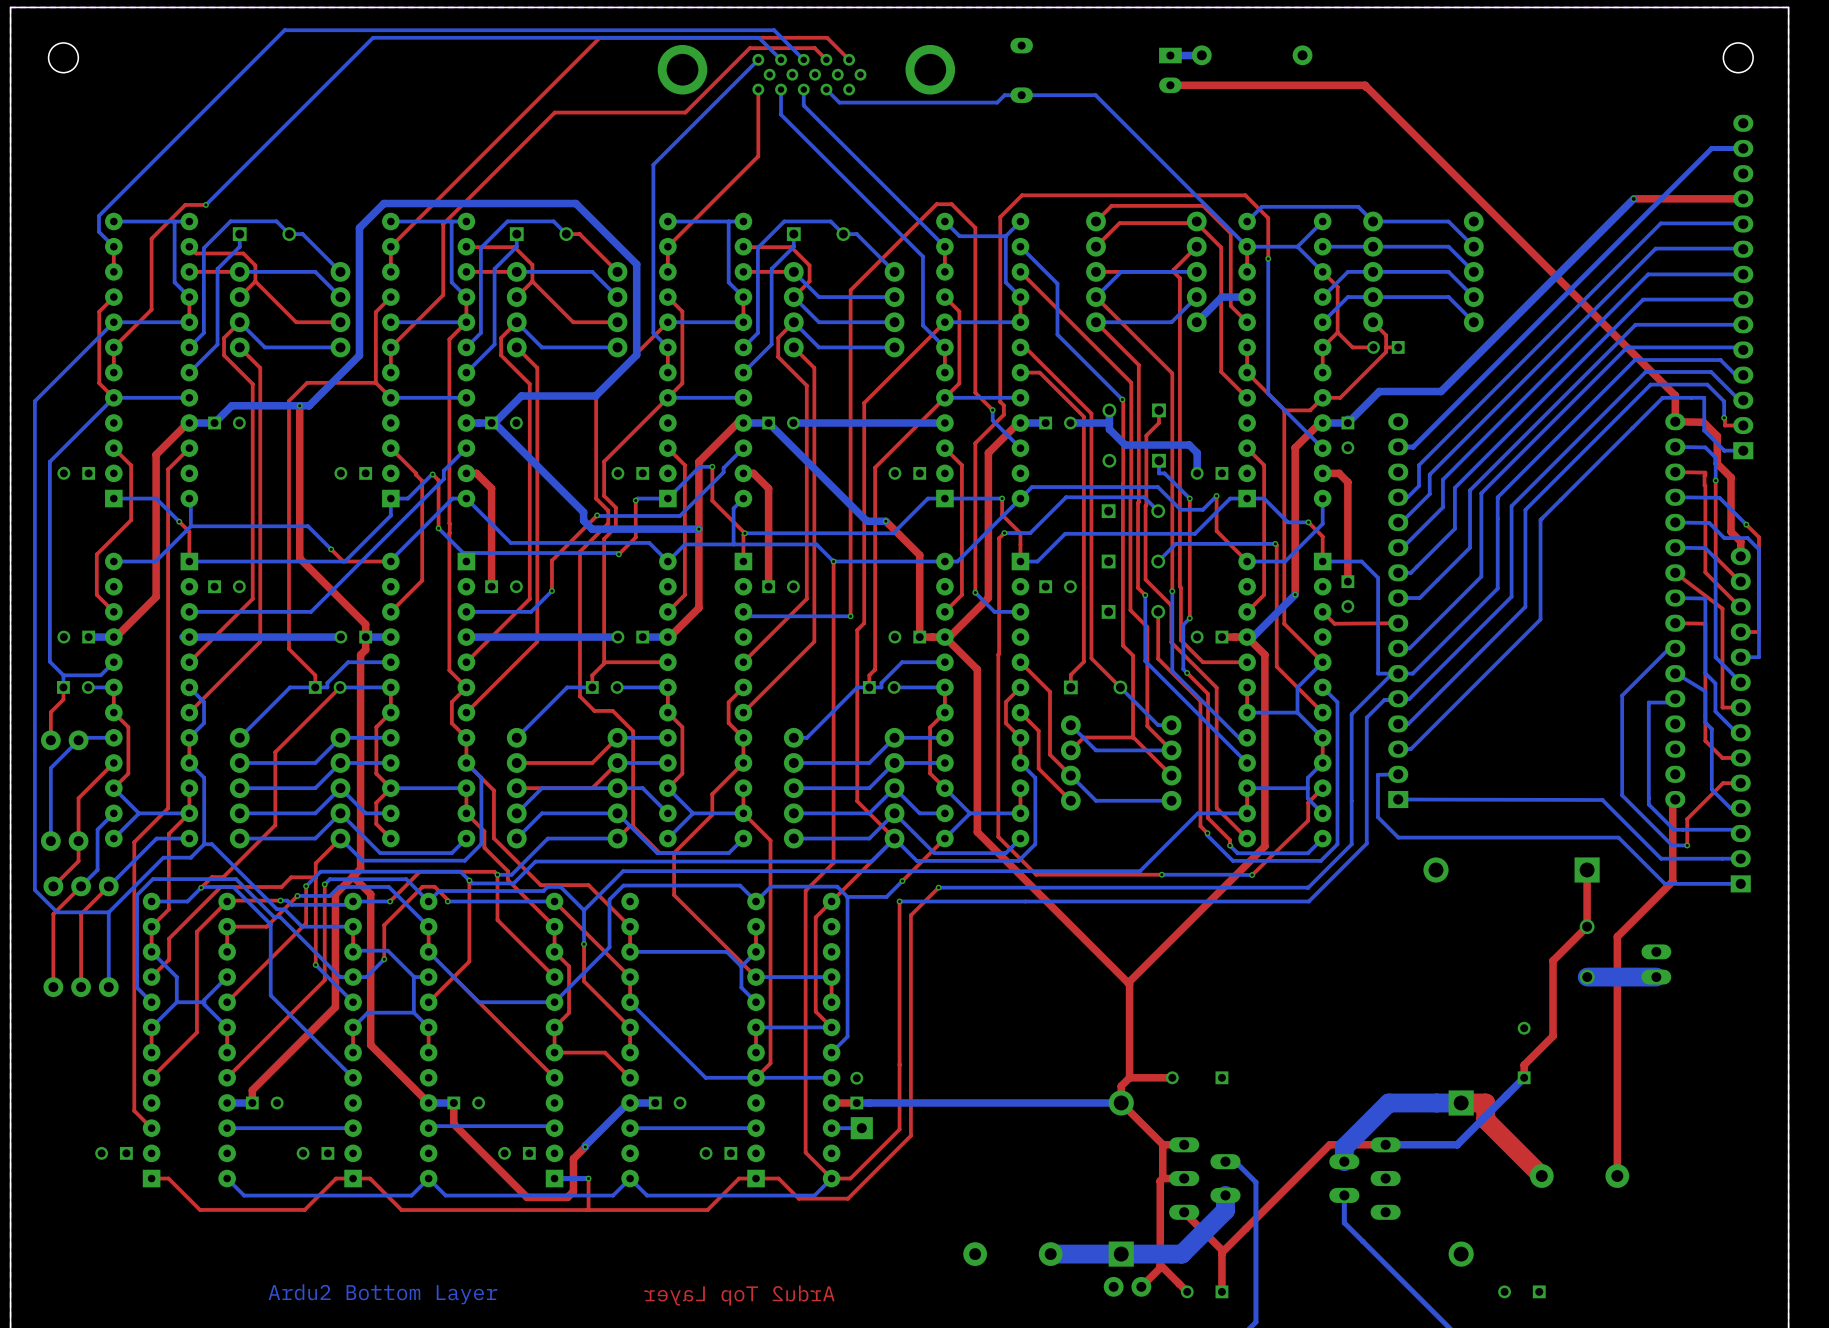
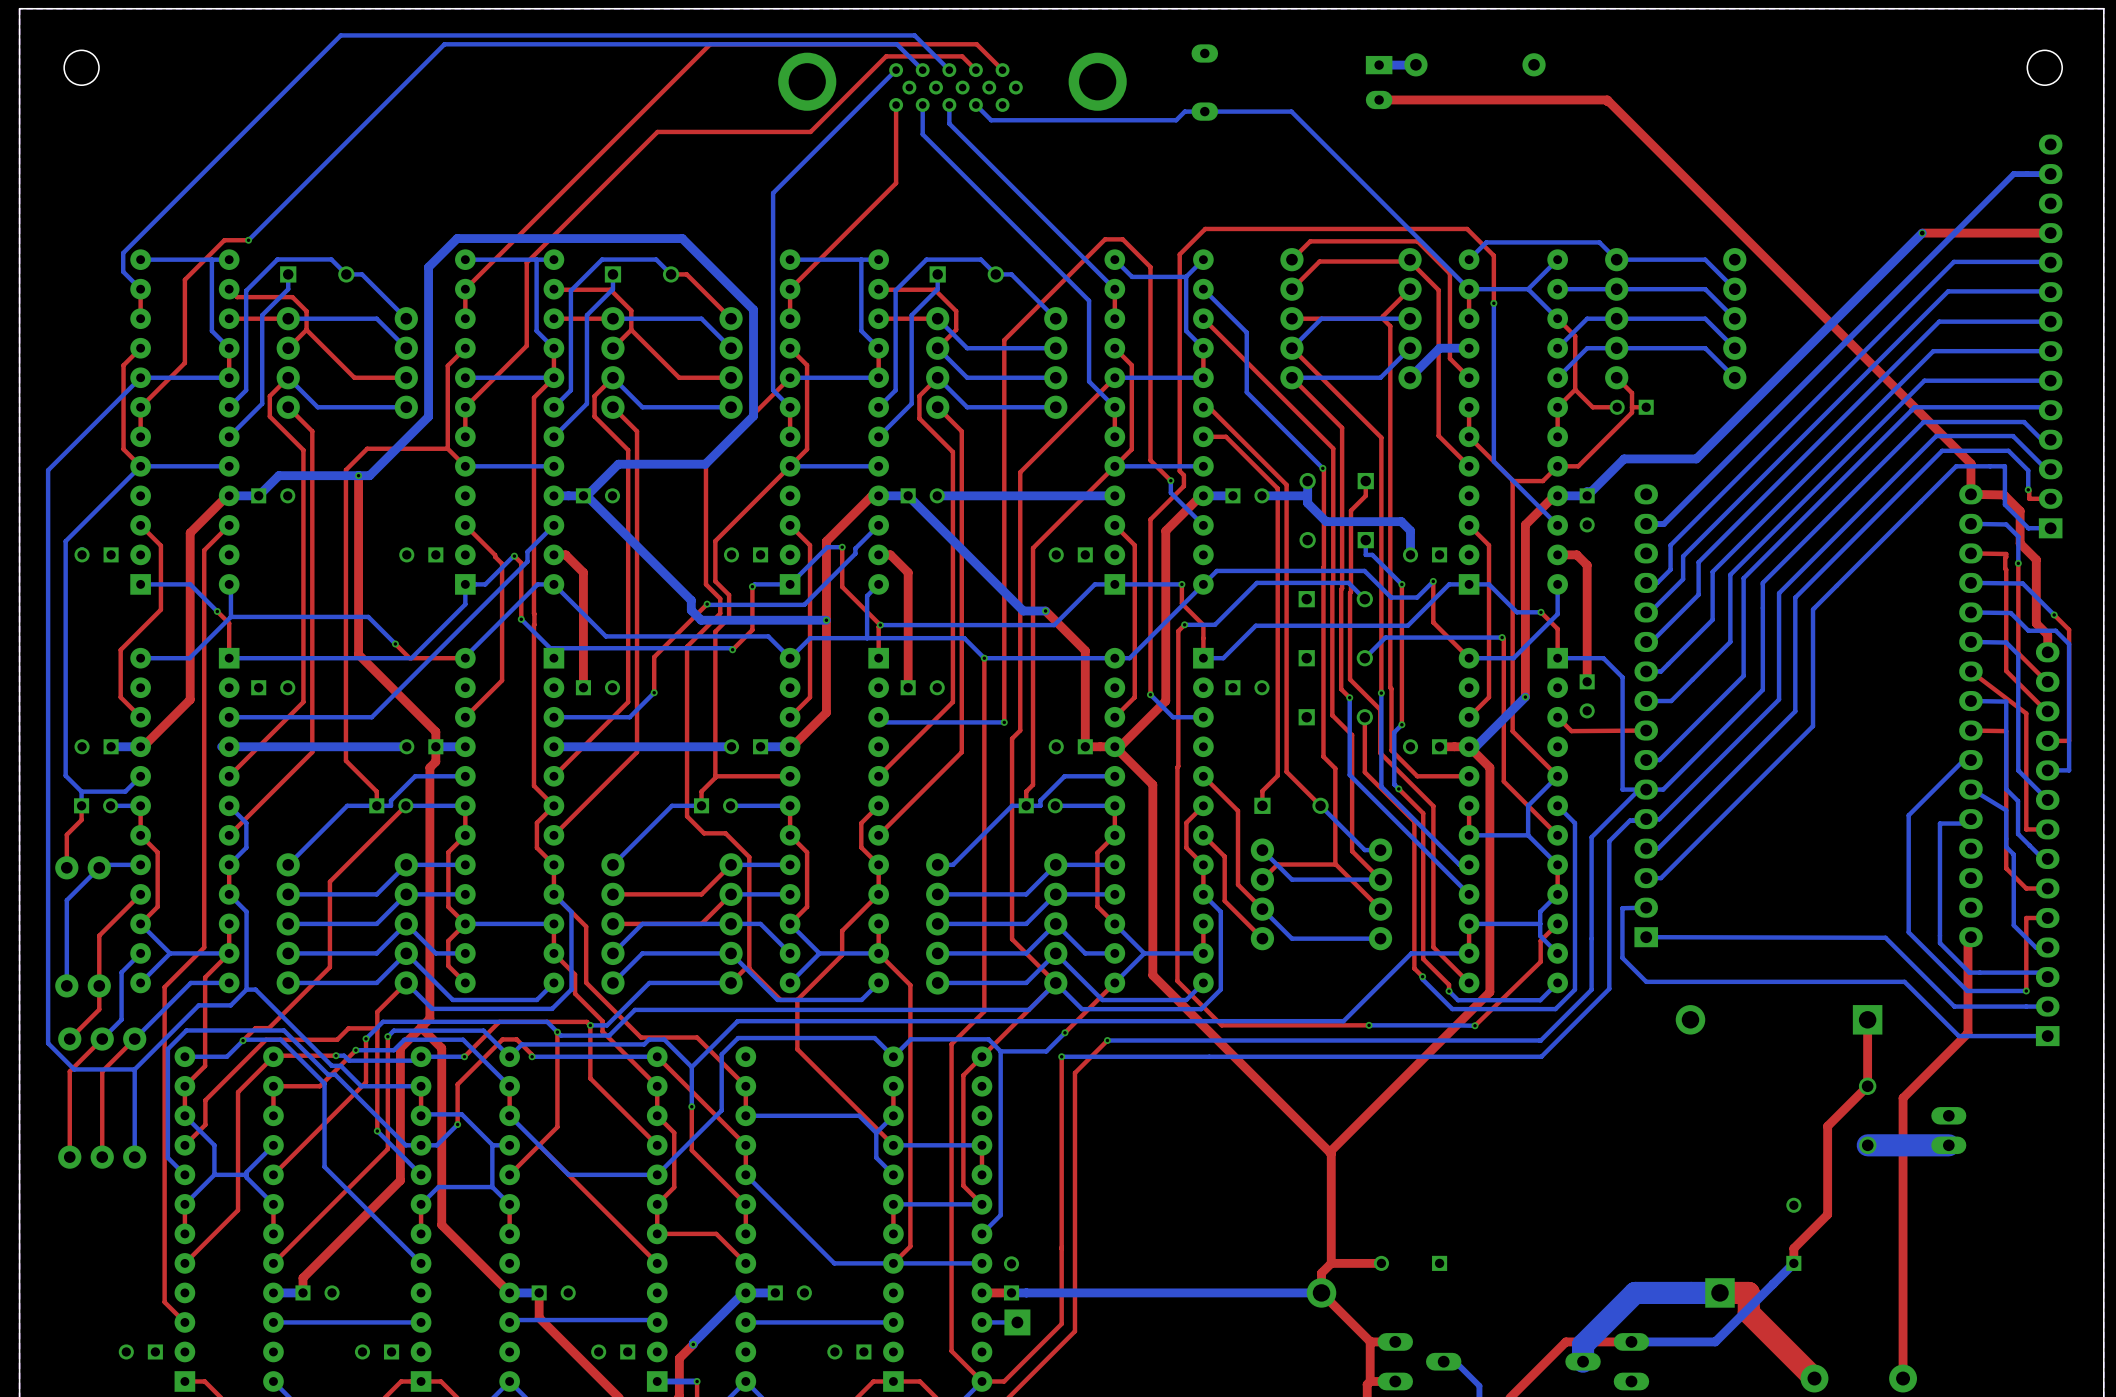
top track: (1723, 783) (1687, 819) (1687, 845) -> (2027, 918) (2026, 990)
bottom track: (1672, 845) (1687, 845) -> (1967, 990) (2026, 990)
via position: (1687, 845) -> (2026, 990)

